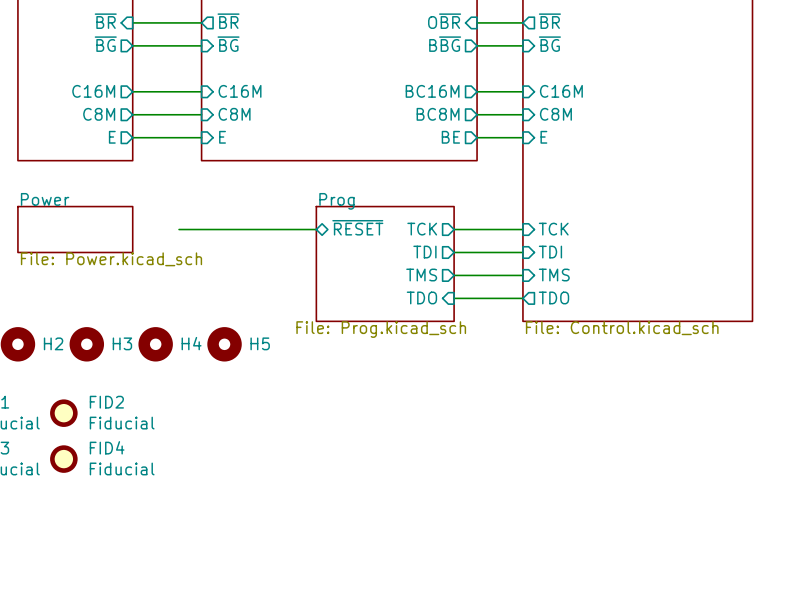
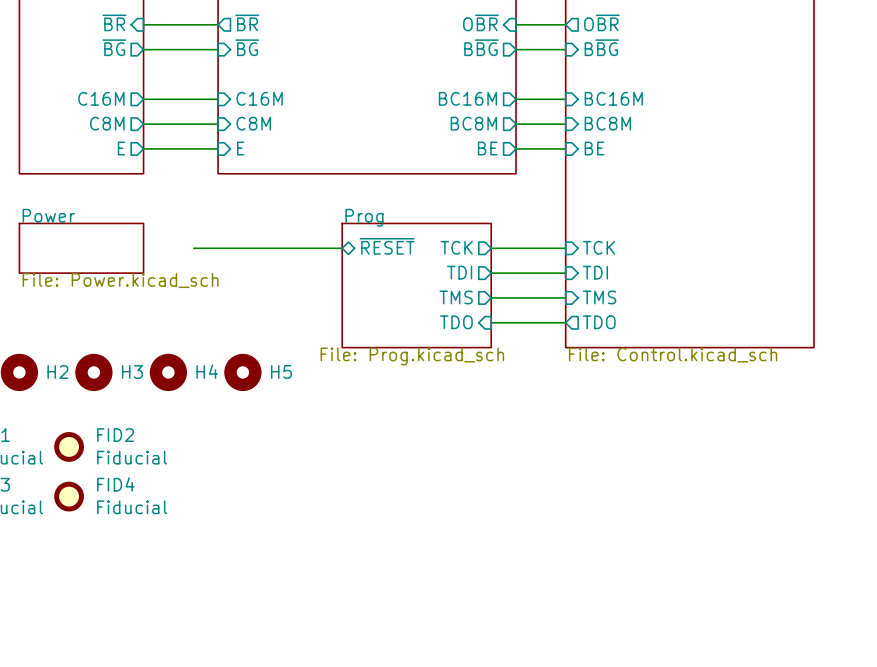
sheet pin: ~{BR} (549, 21) -> O~{BR} (601, 22)
sheet pin: ~{BG} (549, 44) -> B~{BG} (601, 47)
sheet pin: C16M (561, 91) -> BC16M (613, 98)
sheet pin: C8M (555, 114) -> BC8M (607, 123)
sheet pin: E (543, 137) -> BE (594, 148)

